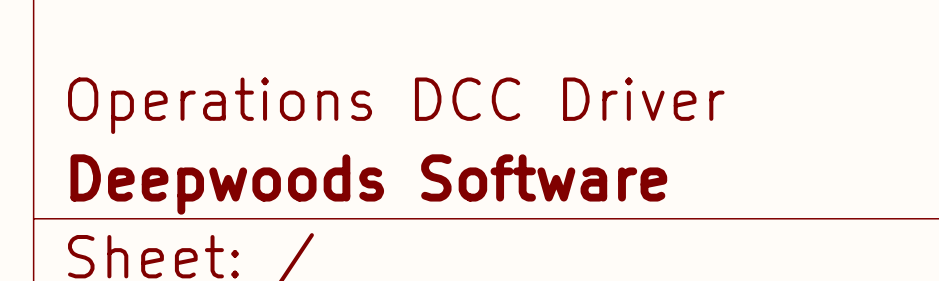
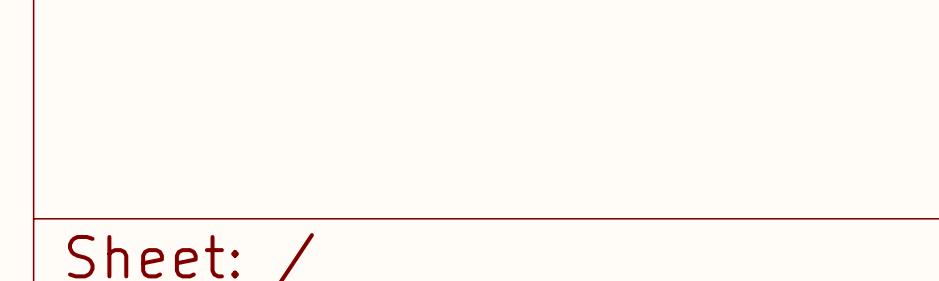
title block: Operations DCC Driver (396, 105) -> none
title block: Deepwoods Software (368, 184) -> none

